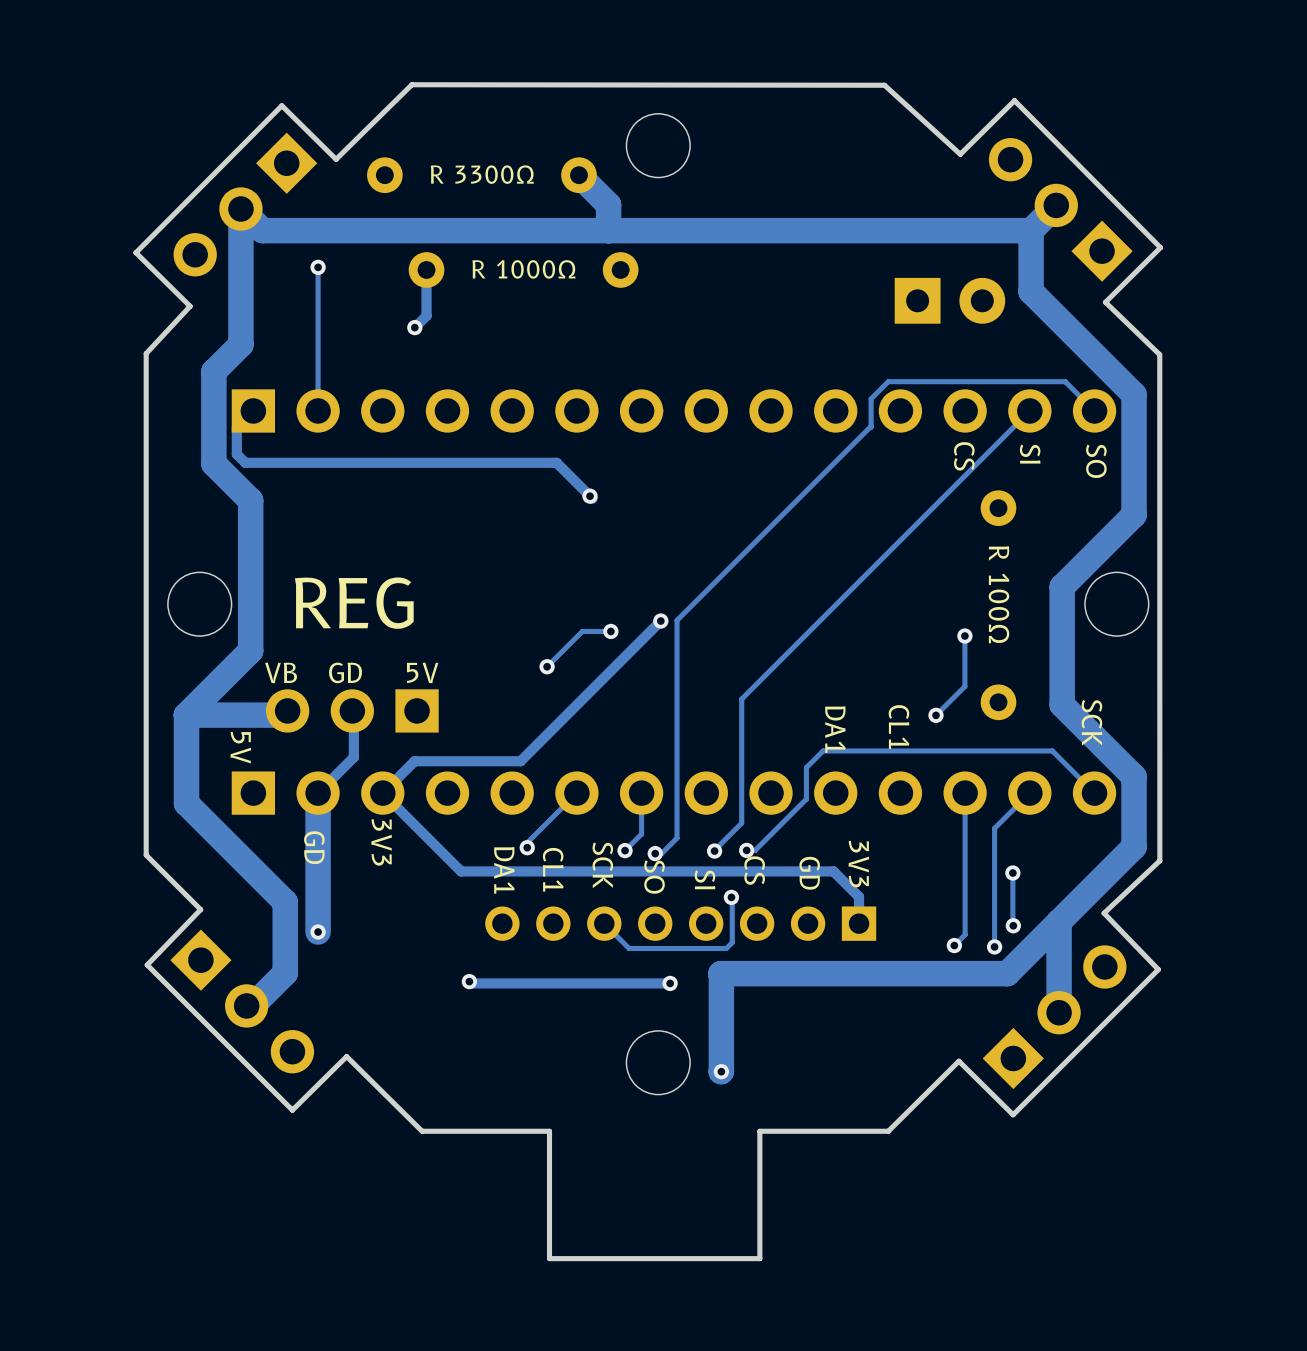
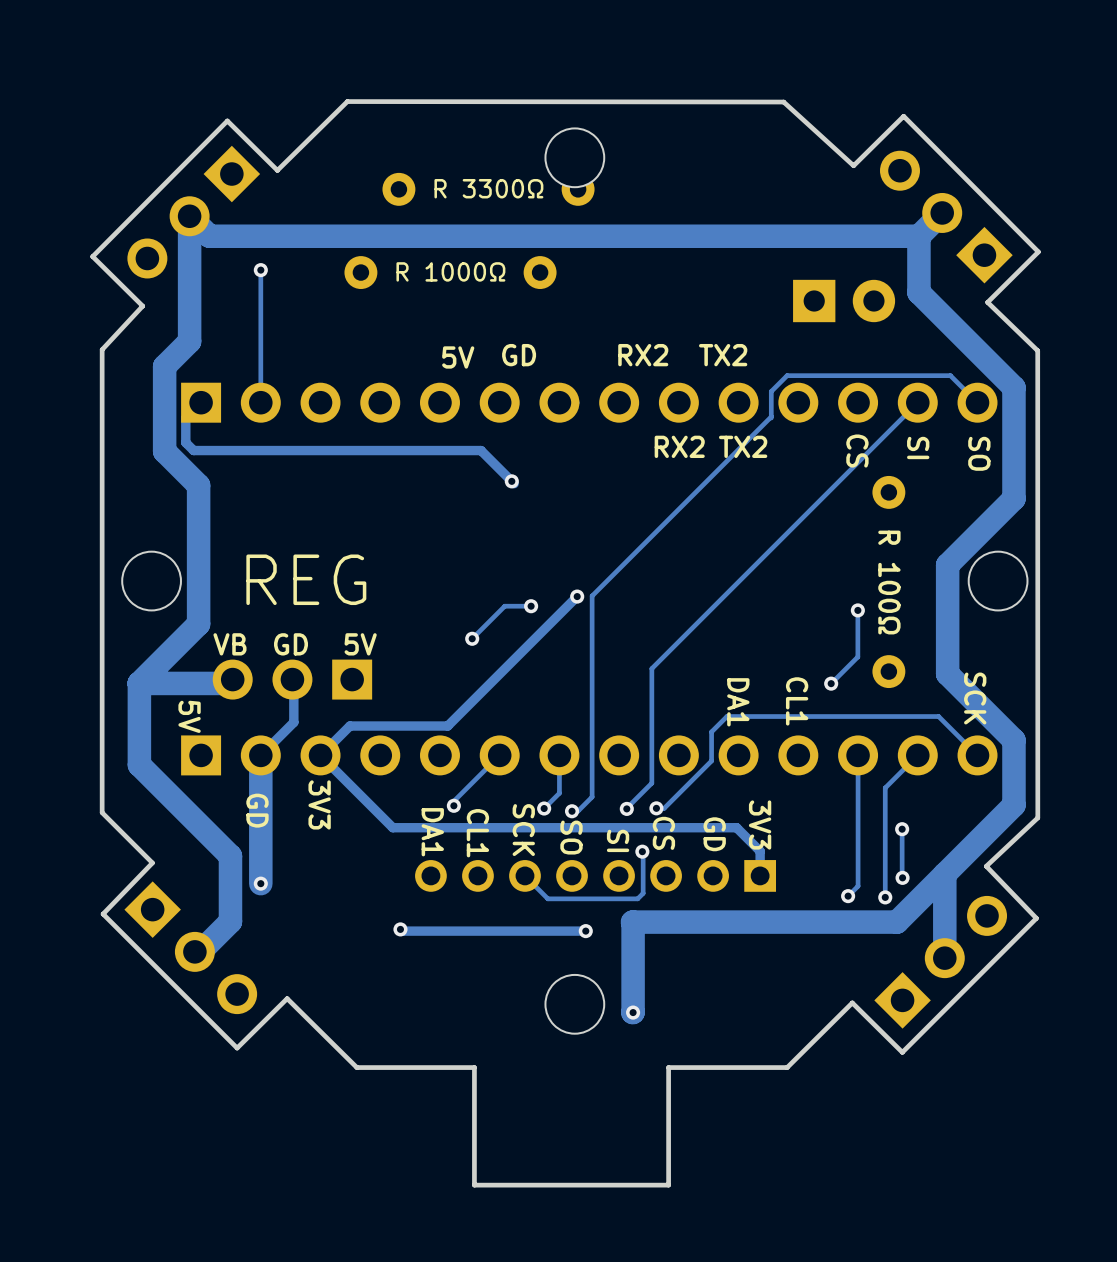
part position: (481, 175) -> (488, 189)
track: (578, 175) (608, 204) (608, 230) -> none
track: (426, 269) (426, 315) (414, 327) -> none
via: (414, 327) -> none
text: none -> GD (519, 355)
text: none -> RX2 (643, 355)
text: none -> TX2 (723, 355)
text: none -> 5V (458, 357)
text: none -> RX2 (679, 446)
text: none -> TX2 (743, 446)

